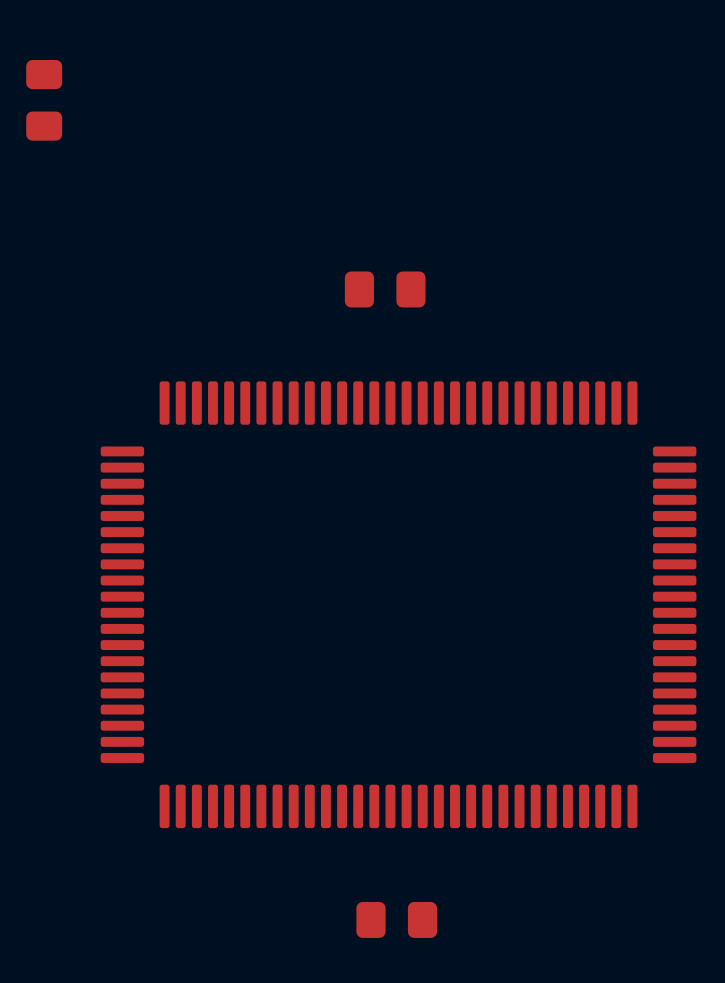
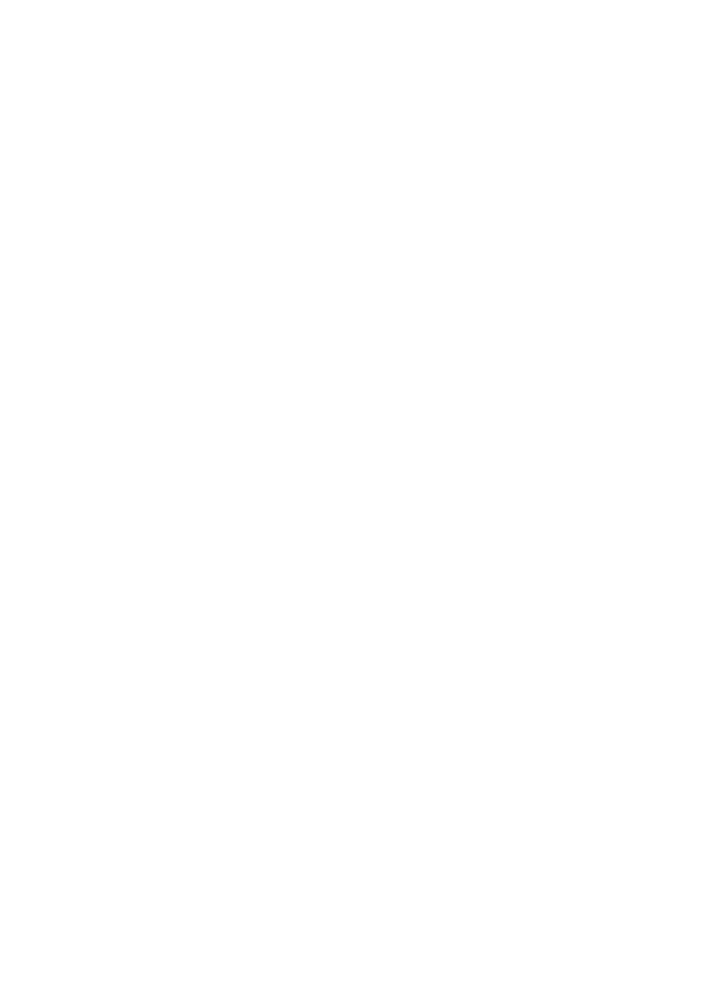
part: (44, 100) -> none
part: (385, 289) -> none
part: (398, 604) -> none
part: (396, 919) -> none

